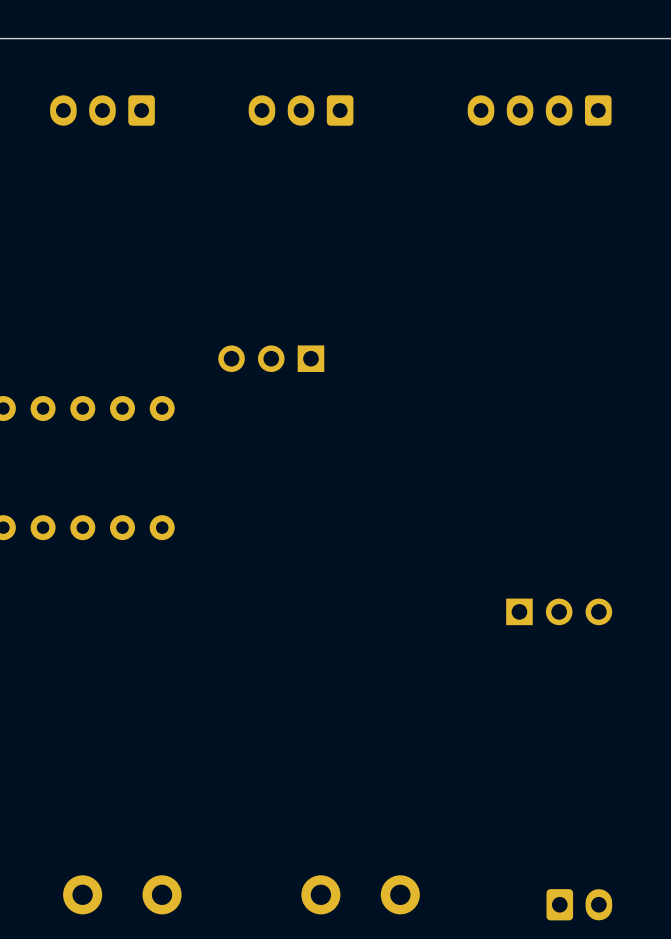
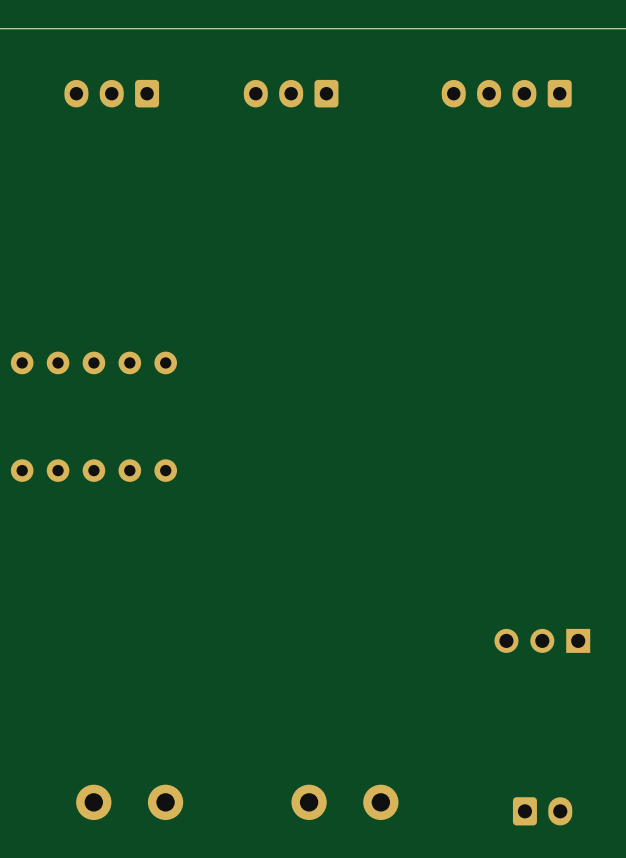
part: (271, 358) -> none
part: (559, 611) -> none
part: none -> (542, 640)

